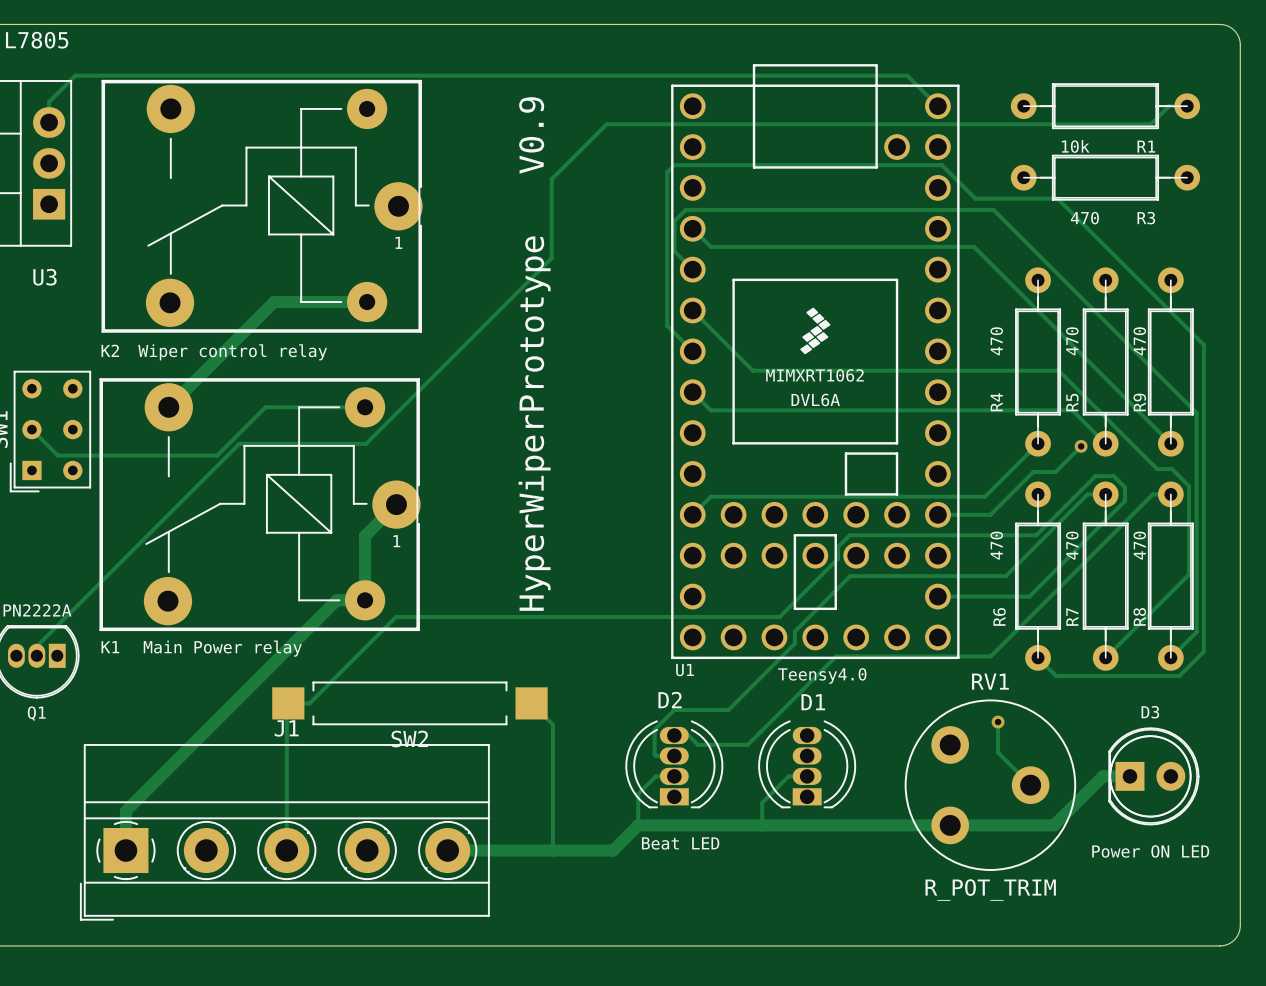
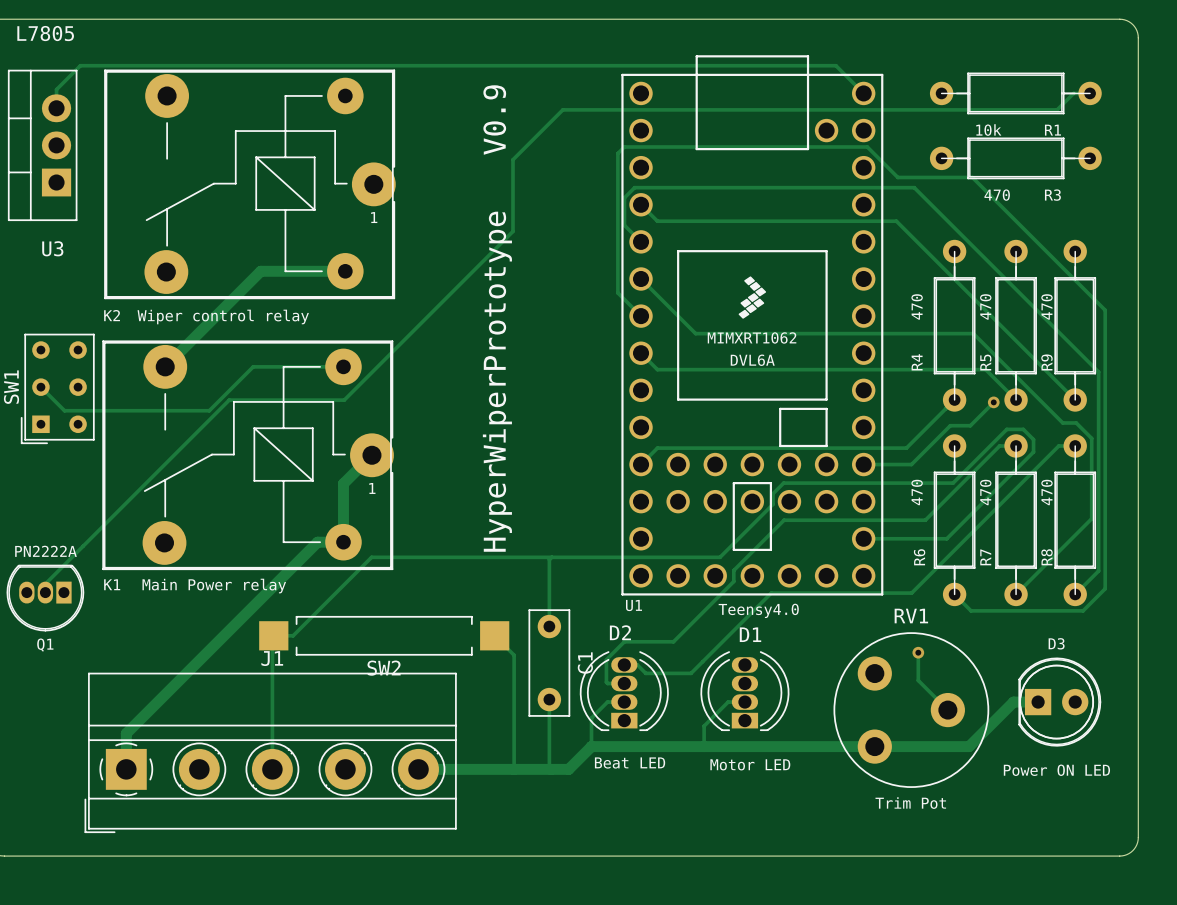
track: none -> (551, 557) (549, 559) (549, 626)
C1: none -> (549, 663)
track: none -> (549, 699) (549, 767) (551, 769)
D1 value: none -> Motor LED (750, 764)
RV1 value: R_POT_TRIM (990, 890) -> Trim Pot (910, 803)

